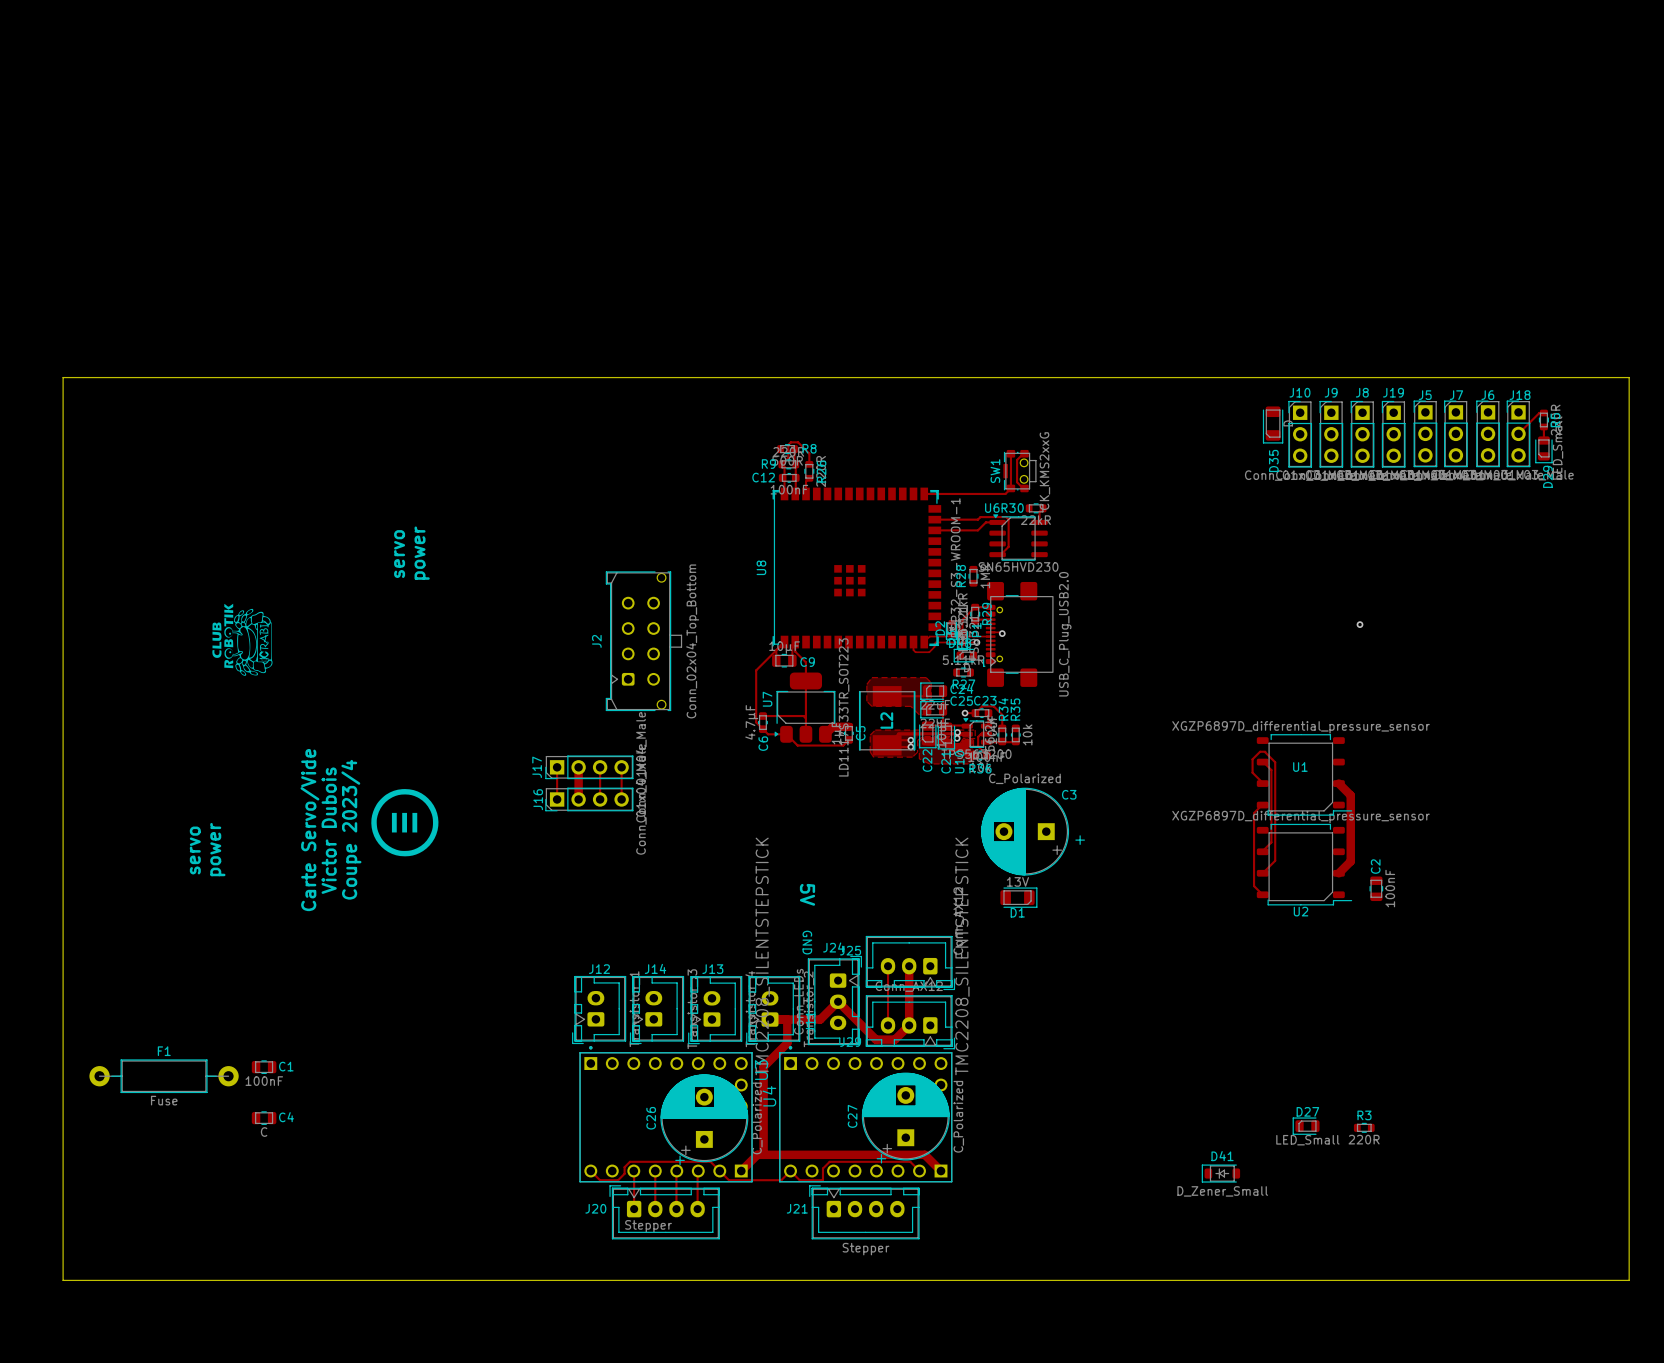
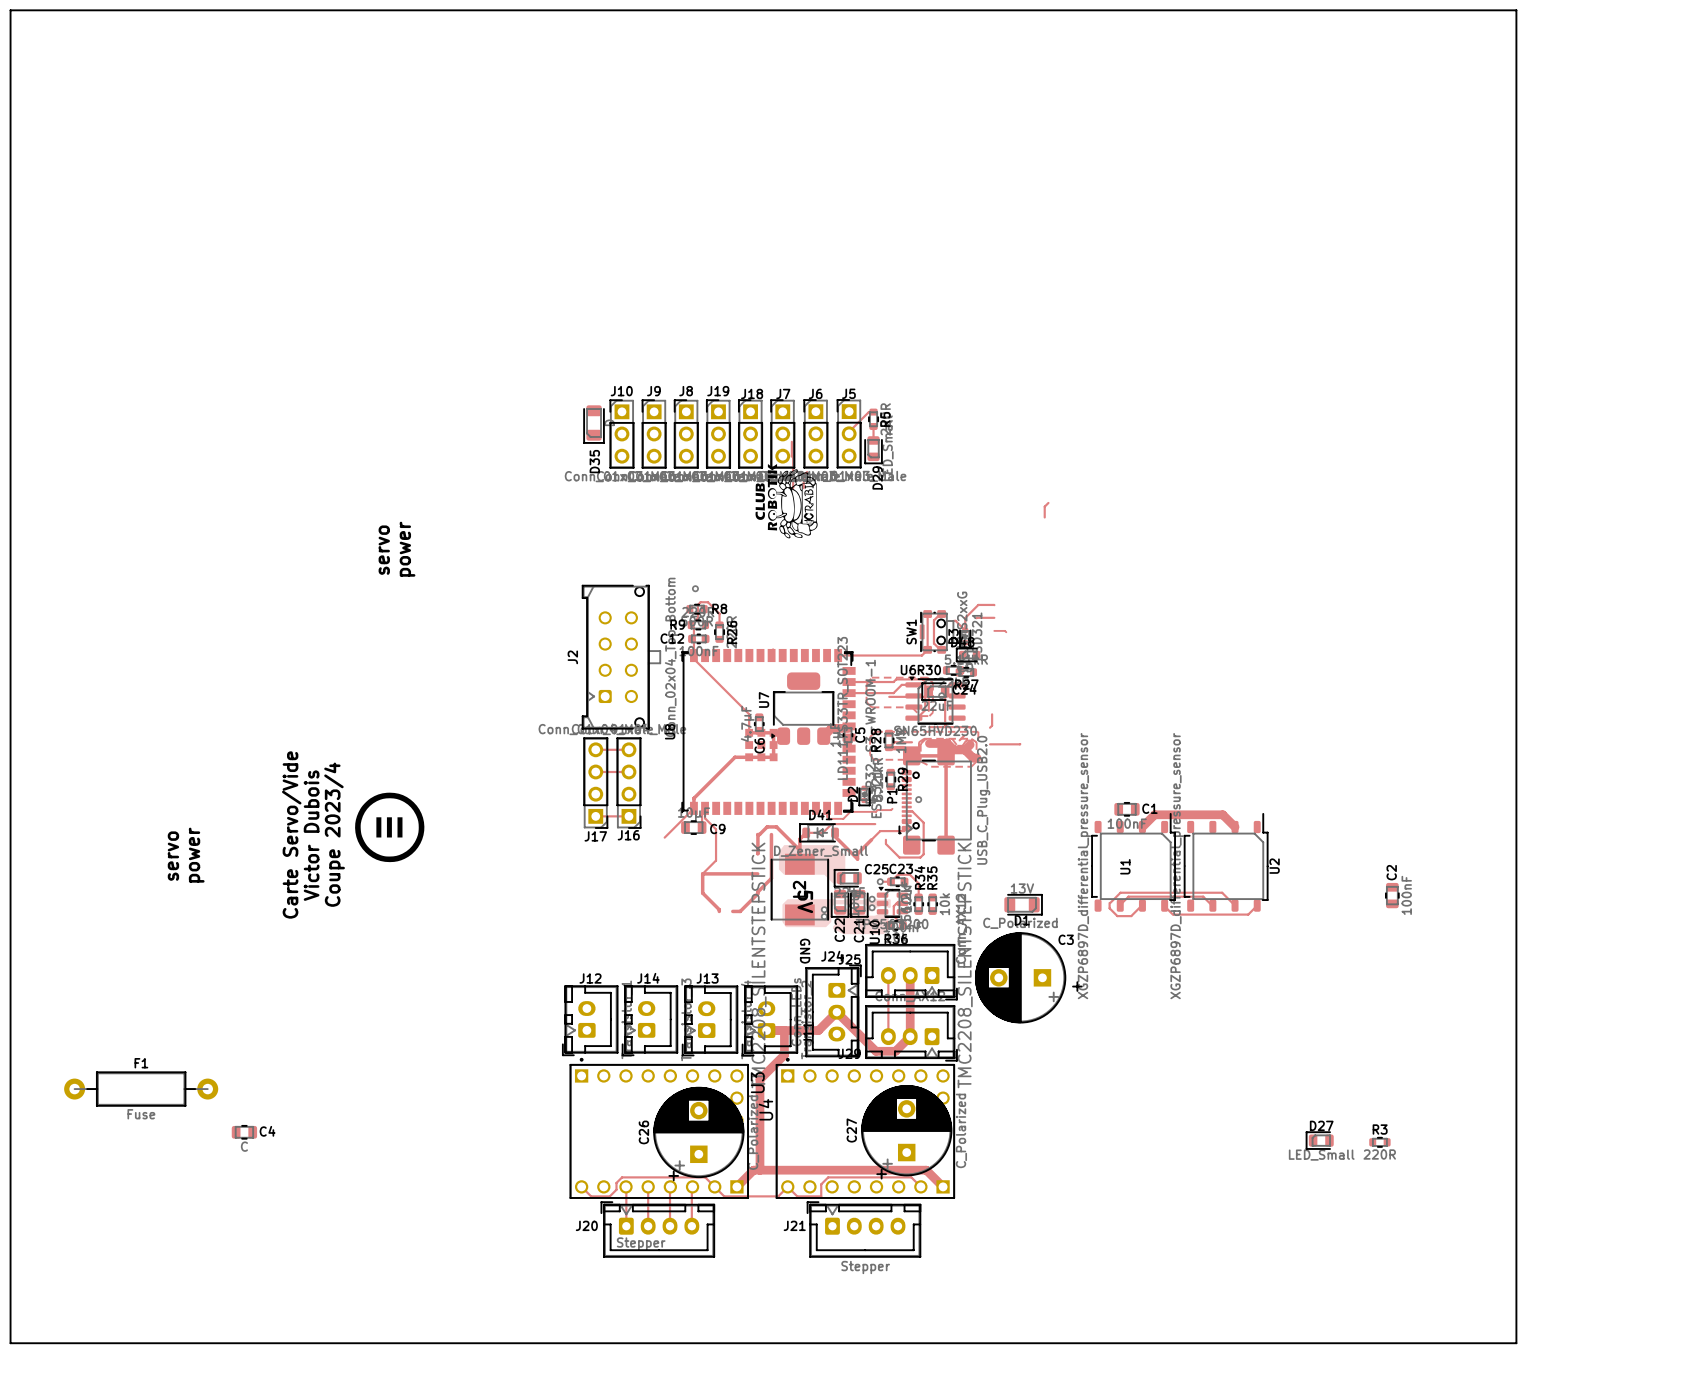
board edge: (63, 377) (1629, 377) (1629, 1280) (63, 1280) (63, 377) -> (10, 10) (10, 1343) (1516, 1343) (1516, 10) (10, 10)
track: (1543, 413) (1539, 413) (1518, 433) -> none
R5 position: (1543, 419) -> (873, 419)
track: none -> (873, 412) (868, 412) (847, 433)
D35 position: (1273, 424) -> (594, 424)
track: (1543, 426) (1543, 440) -> none
J5 position: (1425, 433) -> (849, 433)
J7 position: (1455, 433) -> (782, 433)
J6 position: (1488, 433) -> (815, 433)
J18 position: (1518, 433) -> (750, 433)
track: none -> (873, 426) (873, 440)
J10 position: (1300, 434) -> (621, 434)
J9 position: (1331, 434) -> (654, 434)
J8 position: (1362, 434) -> (686, 434)
J19 position: (1393, 434) -> (718, 434)
R8 position: (787, 449) -> (697, 609)
D29 position: (1543, 449) -> (873, 450)
track: (1010, 453) (1010, 488) (1005, 493) (924, 493) -> (927, 614) (927, 649) (921, 655) (838, 655)
track: (1024, 453) (1017, 459) (1017, 482) (1024, 488) -> (941, 614) (933, 620) (933, 643) (941, 649)
R9 position: (788, 464) -> (698, 624)
track: (809, 464) (809, 453) (798, 442) (790, 442) (788, 444) (788, 457) (781, 464) (784, 467) (784, 493) -> none
drawing: none -> [755, 463, 818, 539]
R26 position: (809, 471) -> (719, 632)
SW1 position: (1019, 471) -> (936, 631)
C12 position: (789, 477) -> (698, 638)
R30 position: (1036, 508) -> (953, 670)
track: (934, 519) (977, 519) (980, 517) (1006, 517) (1008, 519) (1008, 546) (1000, 554) (997, 554) -> (849, 682) (893, 682) (896, 679) (922, 679) (925, 681) (925, 710) (917, 718) (913, 718)
track: (997, 522) (985, 522) (977, 530) (934, 530) -> (913, 684) (901, 684) (893, 693) (849, 693)
U6 position: (1018, 537) -> (935, 700)
U8 position: (856, 568) -> (768, 731)
R28 position: (973, 576) -> (888, 740)
via: none -> (695, 588)
drawing: [212, 603, 273, 676] -> none
R29 position: (975, 614) -> (890, 779)
via: (1360, 624) -> none
track: none -> (719, 624) (719, 613) (707, 602) (700, 602) (697, 604) (697, 618) (691, 624) (693, 627) (693, 659) (749, 714) (749, 732) (773, 732) (773, 757) (735, 757) (693, 798) (693, 808) (664, 837)
D2 position: (951, 629) -> (864, 795)
via: (1002, 633) -> none
P1 position: (1018, 634) -> (935, 800)
track: (990, 636) (929, 636) (924, 642) -> none
J2 position: (643, 641) -> (621, 657)
track: (784, 642) (756, 670) (756, 722) (768, 734) (786, 734) (797, 745) (843, 745) (848, 739) -> none
track: (913, 642) (913, 650) (915, 652) (929, 652) (935, 642) (976, 642) -> none
via: (976, 642) -> none
C9 position: (784, 660) -> (693, 827)
track: (792, 660) (792, 644) (795, 642) (795, 651) (805, 662) (805, 734) -> none
via: none -> (941, 695)
C25 position: (933, 709) -> (847, 878)
track: (965, 713) (975, 713) (982, 706) (993, 706) (1002, 714) (1002, 728) -> (880, 881) (890, 881) (897, 874) (909, 874) (918, 883) (918, 897)
via: (965, 713) -> none
C23 position: (981, 713) -> (897, 881)
track: (762, 716) (803, 716) (805, 718) -> none
L2 position: (887, 720) -> (799, 889)
track: (957, 732) (959, 734) (967, 734) (966, 733) (898, 733) (887, 745) -> none
via: (957, 732) -> none
U10 position: (976, 732) -> (892, 902)
C22 position: (927, 734) -> (840, 903)
track: (986, 734) (980, 734) (978, 736) (978, 746) (987, 755) -> (902, 903) (896, 903) (893, 906) (893, 916) (902, 925)
R34 position: (1002, 734) -> (918, 904)
R35 position: (1015, 734) -> (932, 904)
C21 position: (946, 735) -> (859, 903)
via: (957, 738) -> none
via: (910, 740) -> none
track: none -> (888, 747) (903, 747) (911, 755) (946, 755) (946, 845)
track: none -> (595, 749) (628, 749)
via: (910, 747) -> none
track: (1265, 751) (1260, 751) (1252, 759) (1252, 772) (1262, 782) -> none
track: (1265, 752) (1275, 762) (1275, 860) (1262, 873) -> none
R36 position: (980, 755) -> (896, 925)
track: (1262, 761) (1271, 770) (1271, 842) (1262, 851) -> none
track: (557, 767) (557, 799) -> none
track: (578, 767) (578, 799) -> none
J17 rotation: 0° (589, 767) -> 90° counterclockwise (595, 783)
track: (600, 767) (600, 799) -> none
track: (621, 767) (621, 799) -> none
track: none -> (595, 771) (628, 771)
U1 rotation: 0° (1304, 774) -> 90° counterclockwise (1133, 862)
U1 position: (1304, 774) -> (1133, 862)
track: (1338, 783) (1350, 795) (1350, 861) (1338, 873) -> none
via: none -> (918, 799)
J16 rotation: 0° (589, 799) -> 90° counterclockwise (628, 783)
track: none -> (827, 808) (827, 816) (829, 818) (843, 818) (850, 811) (875, 811) (892, 808)
track: (1262, 804) (1254, 813) -> none
track: none -> (906, 811) (912, 811) (923, 822) (923, 854) (920, 857) (899, 857) (885, 843) (885, 839)
track: none -> (595, 816) (628, 816)
track: (1254, 813) (1254, 886) (1262, 894) -> none
track: none -> (875, 824) (831, 824) (822, 832) (806, 832) (799, 839) (799, 864)
track: none -> (702, 827) (702, 811) (705, 808) (705, 818) (716, 829) (716, 860) (702, 873)
track: none -> (1142, 827) (1154, 814) (1222, 814) (1235, 827)
track: none -> (906, 828) (904, 831) (880, 831) (857, 853) (857, 859) (835, 836) (835, 832)
track: none -> (771, 834) (771, 878) (740, 911) (732, 911)
C3 position: (1033, 831) -> (1028, 977)
track: none -> (799, 850) (776, 826) (767, 826) (757, 834) (757, 853)
U2 rotation: 0° (1304, 864) -> 90° counterclockwise (1226, 862)
U2 position: (1304, 864) -> (1226, 862)
track: none -> (702, 873) (702, 893) (719, 911)
track: none -> (702, 873) (757, 873)
via: none -> (880, 881)
via: none -> (872, 899)
track: none -> (1109, 902) (1109, 908) (1117, 916) (1131, 916) (1141, 905)
track: none -> (1110, 902) (1120, 892) (1222, 892) (1235, 905)
track: none -> (1119, 905) (1128, 896) (1203, 896) (1212, 905)
track: none -> (1163, 905) (1172, 914)
track: none -> (1257, 905) (1248, 914) (1173, 914)
via: none -> (872, 907)
via: none -> (824, 909)
via: none -> (824, 916)
C1 position: (264, 1067) -> (1126, 809)
D41 position: (1220, 1173) -> (819, 832)

